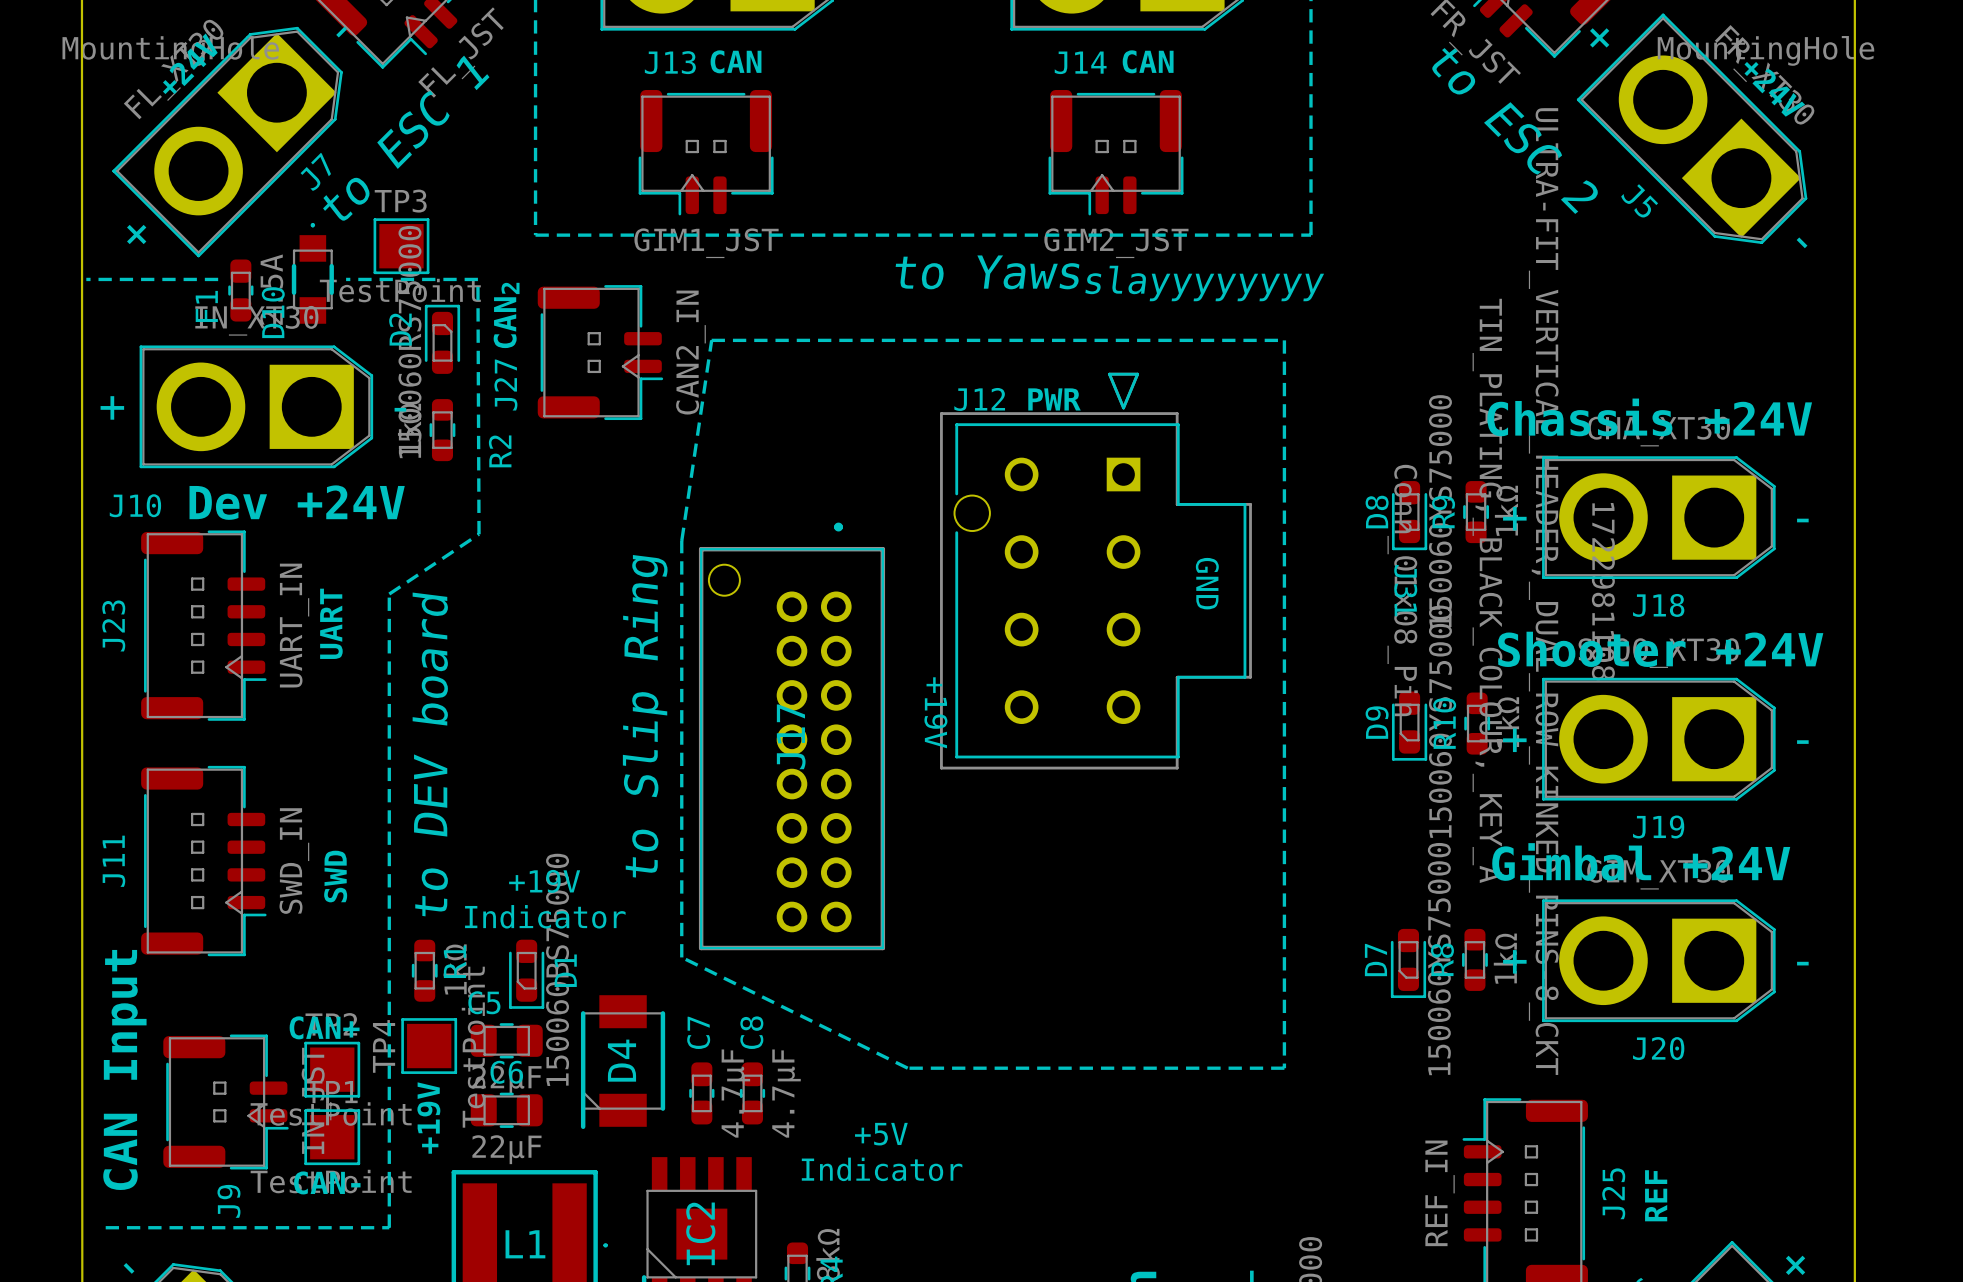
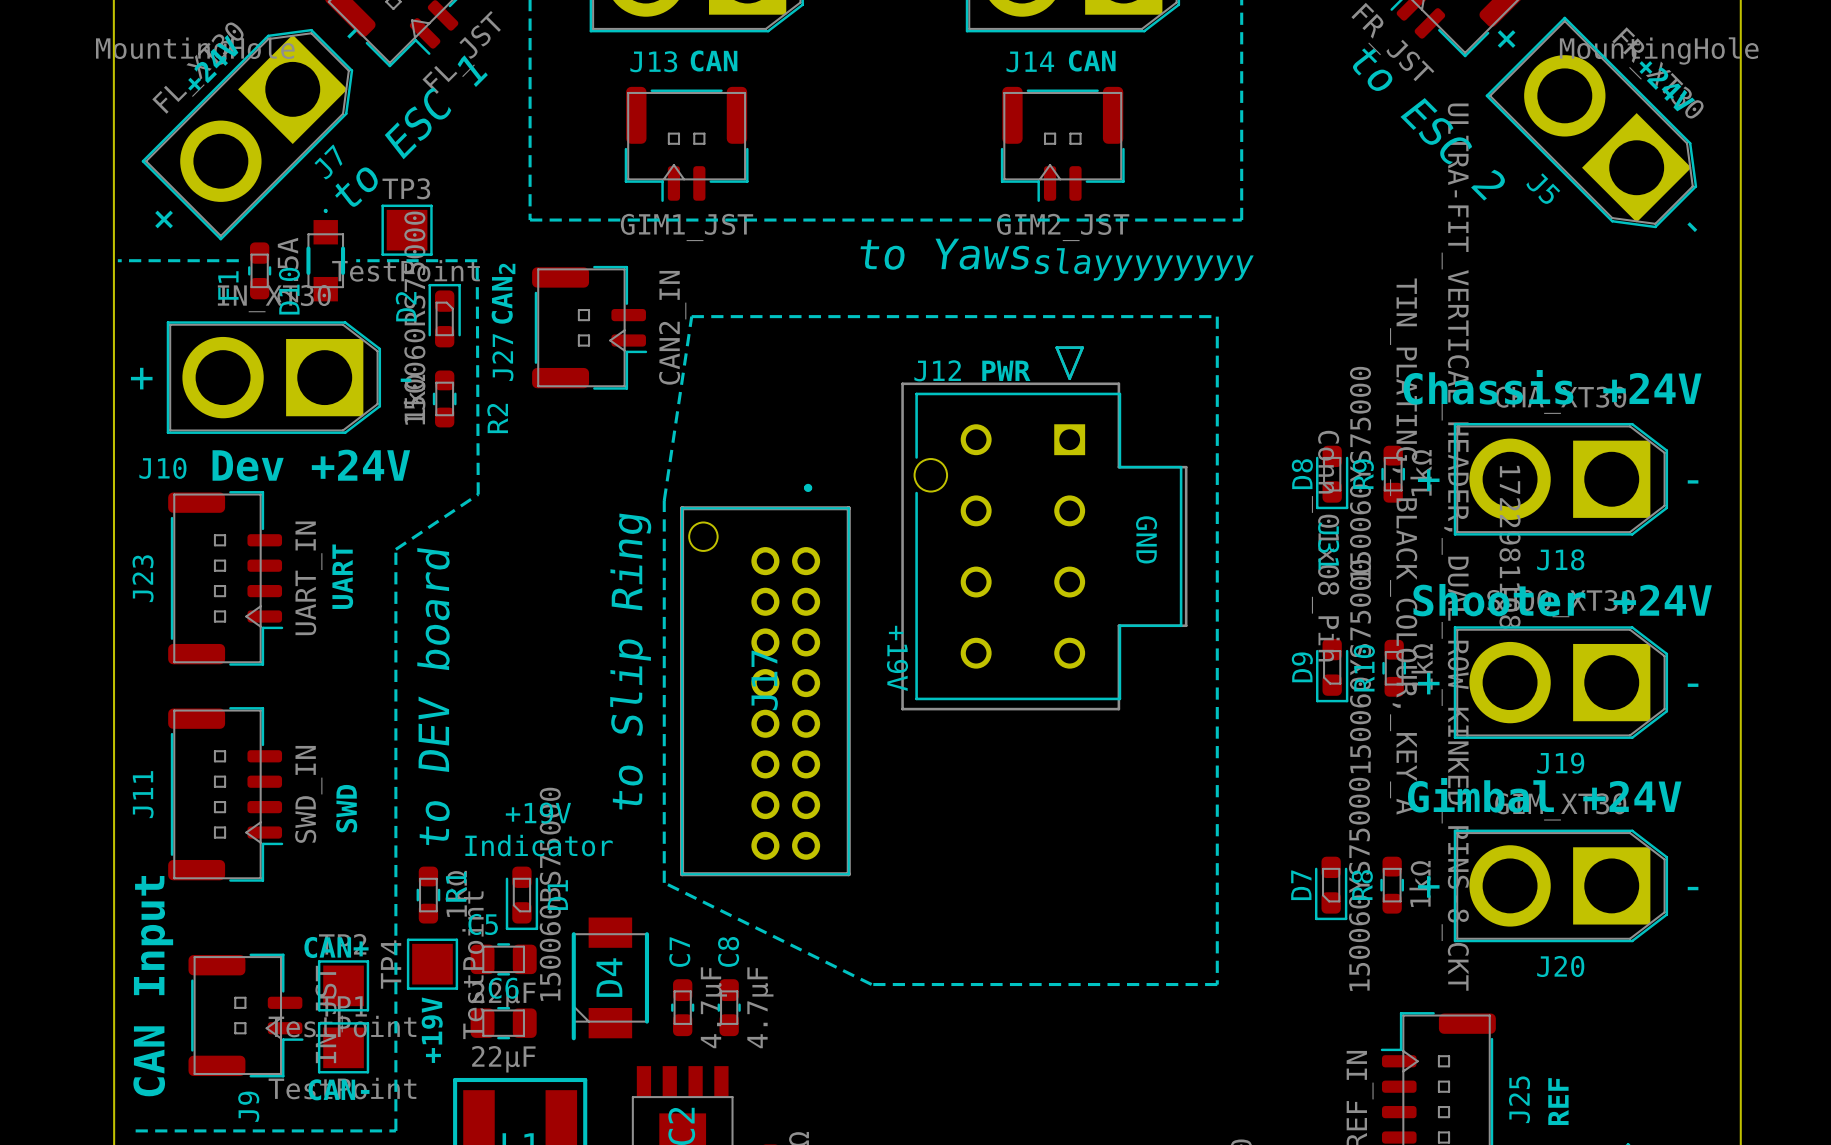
text: +5V (881, 1134) -> none
text: Indicator (882, 1169) -> none

